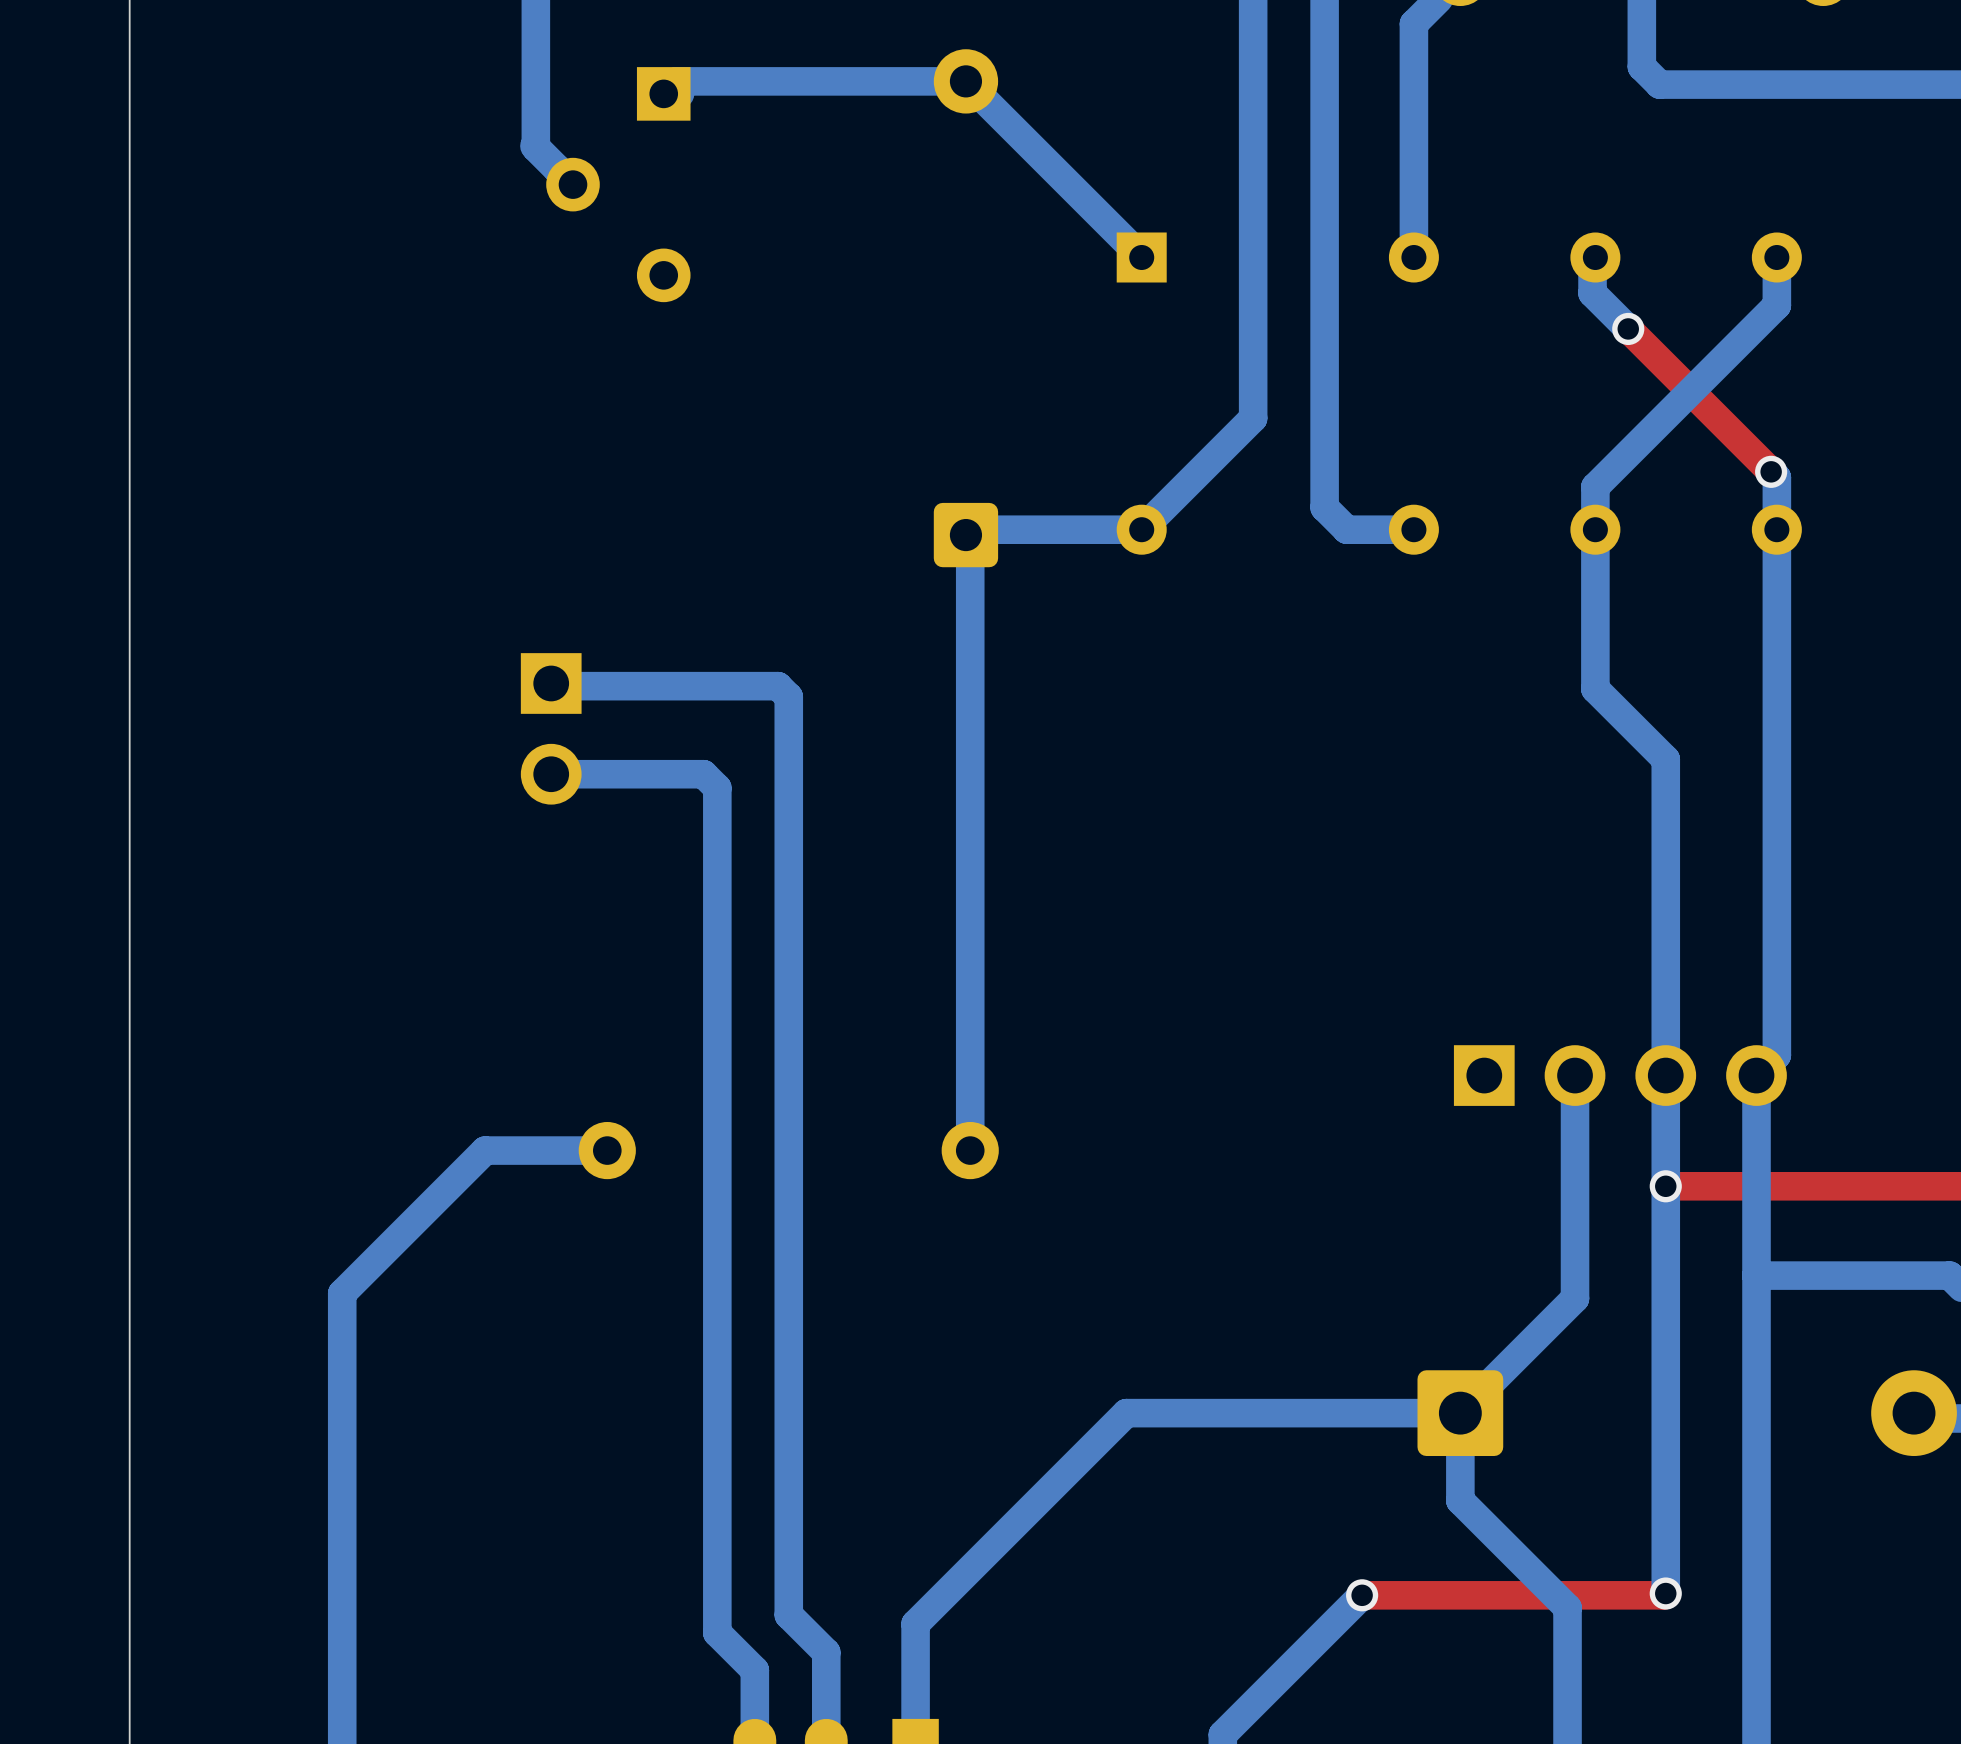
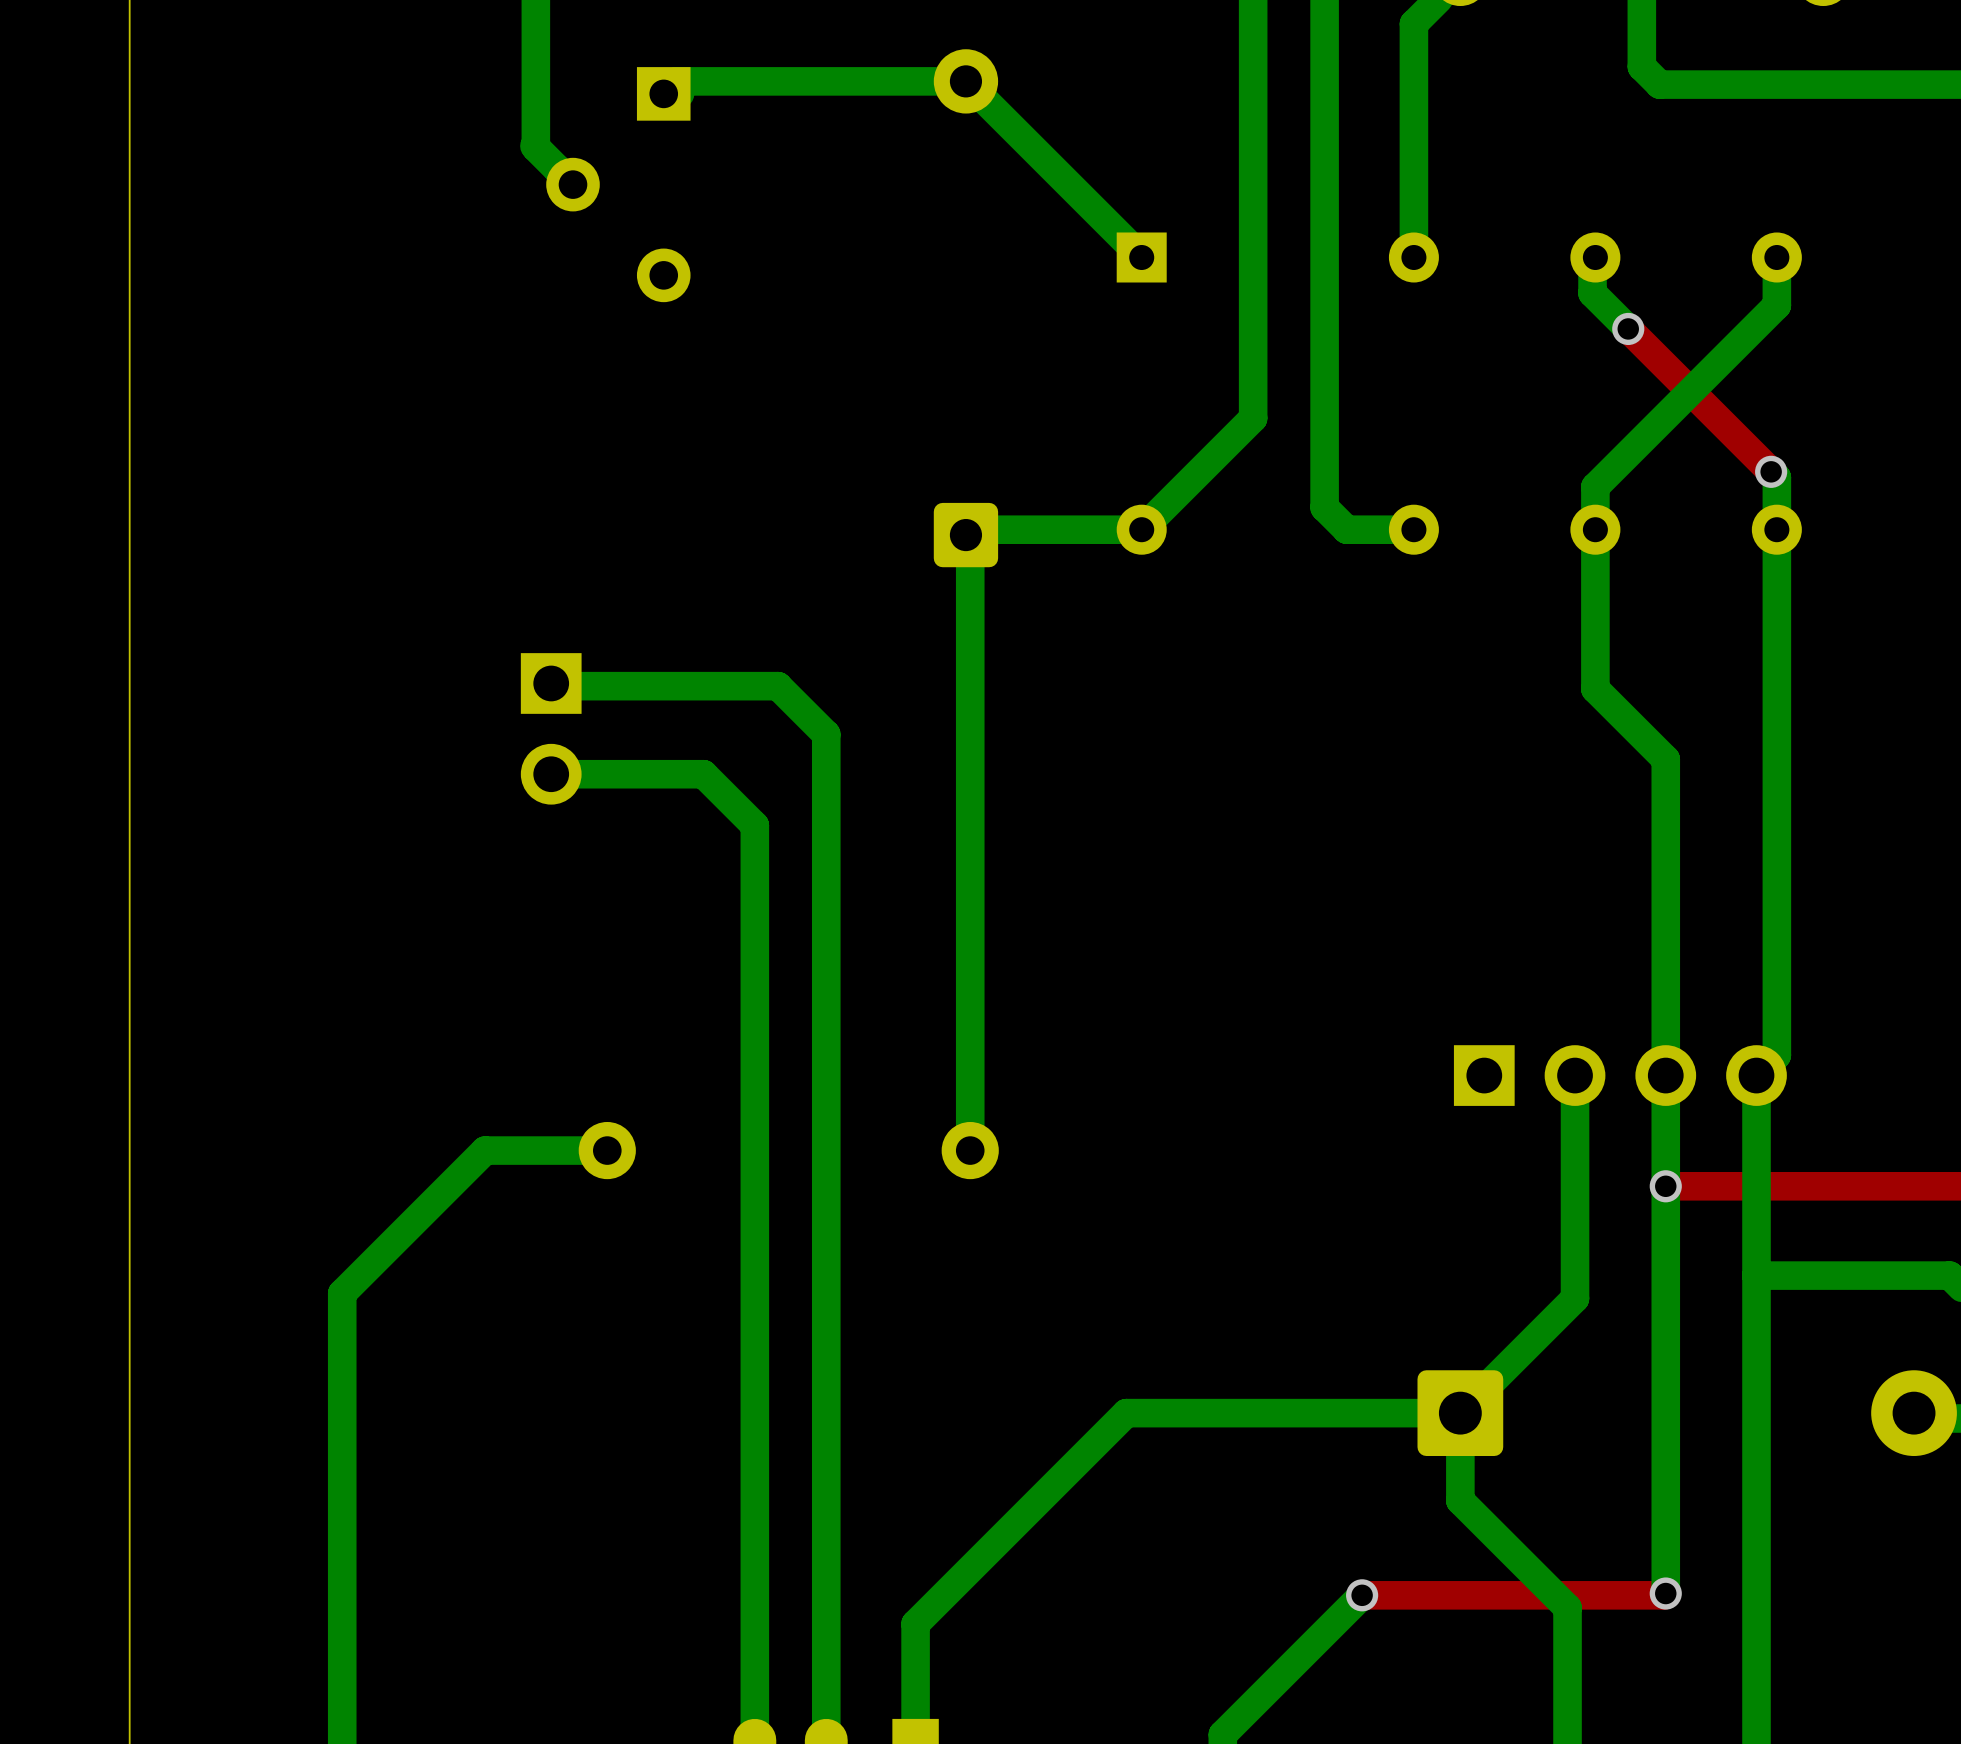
bottom track: (788, 696) (788, 1614) (826, 1652) -> (788, 696) (826, 734) (826, 1652)
bottom track: (717, 787) (717, 1632) (754, 1670) -> (717, 787) (754, 825) (754, 1670)

